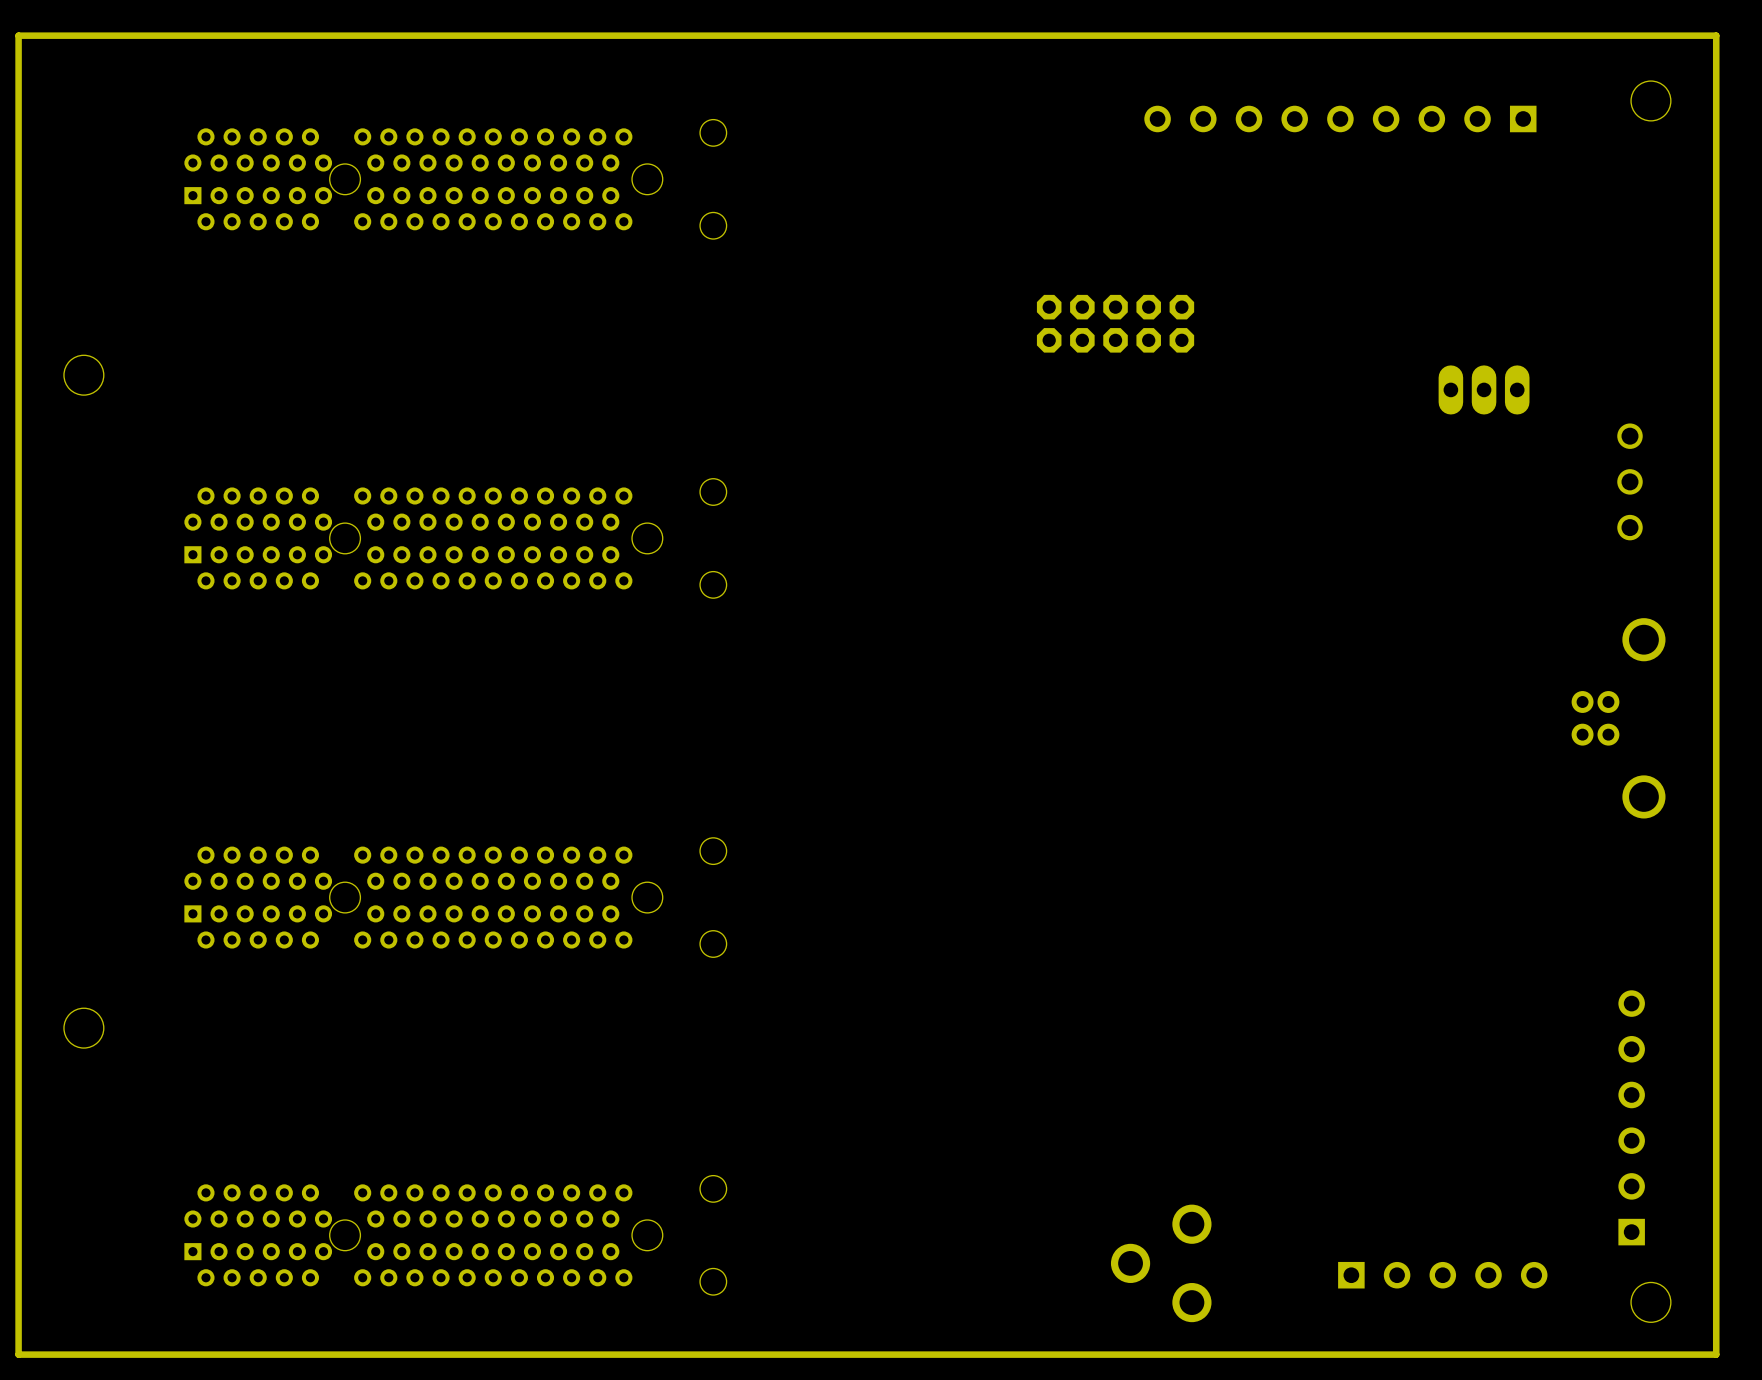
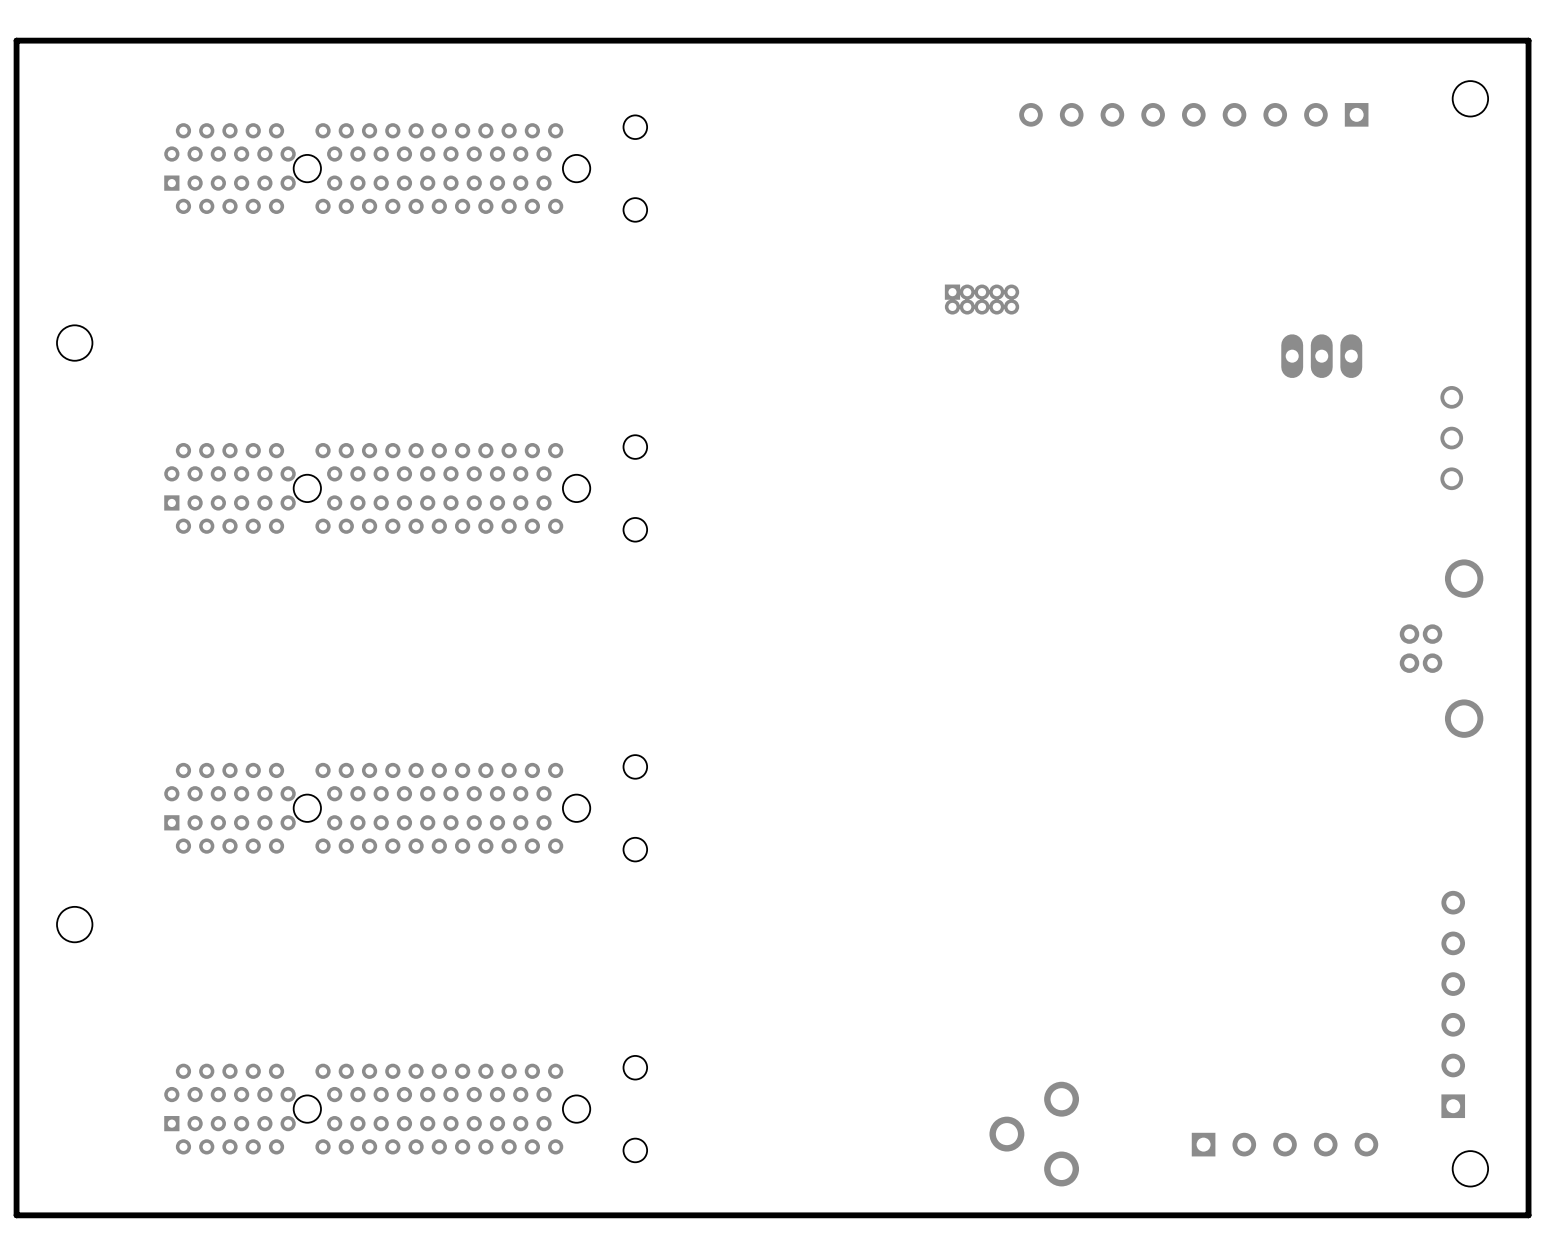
part: (1115, 323) -> none
part: none -> (982, 299)

